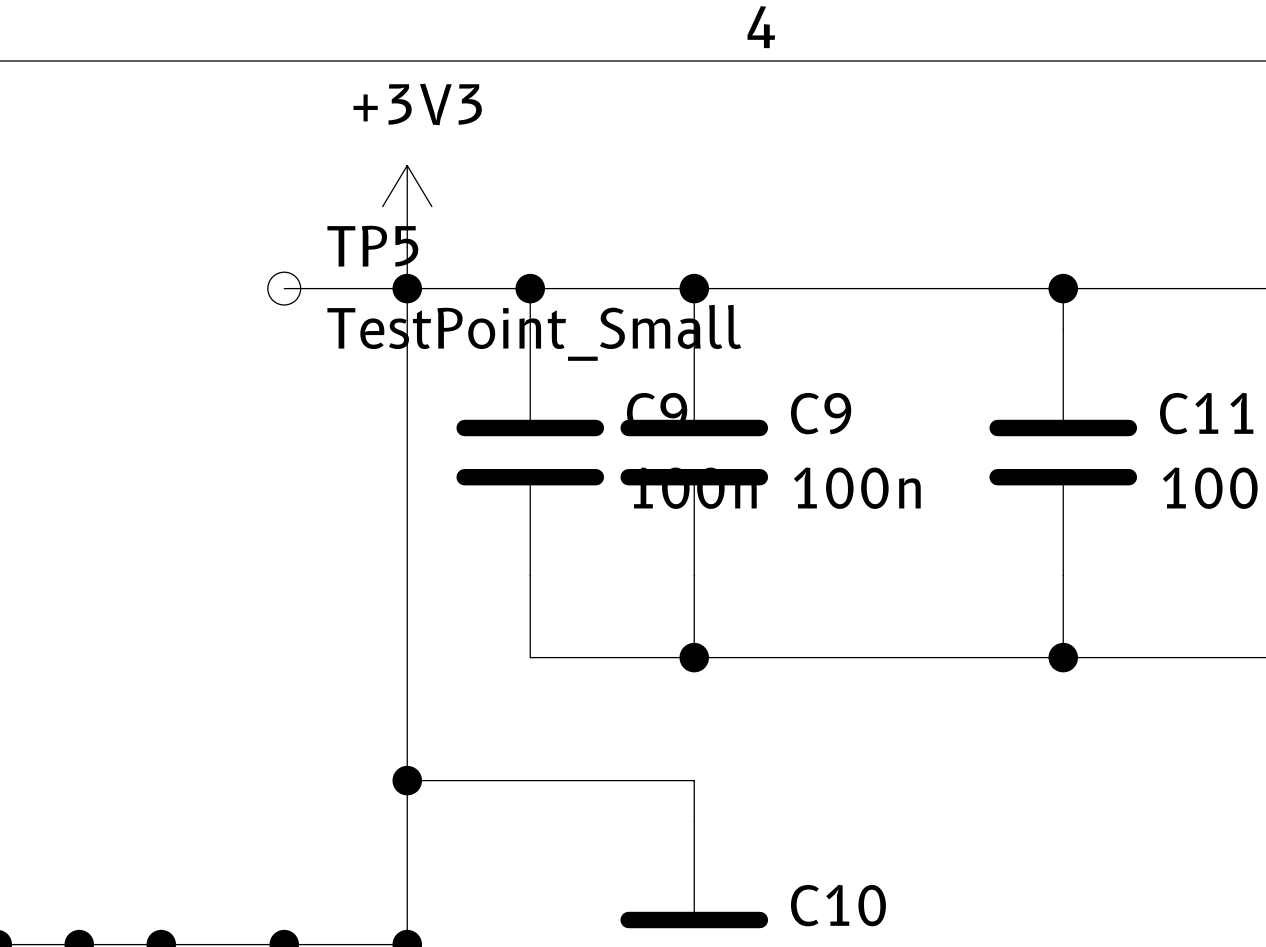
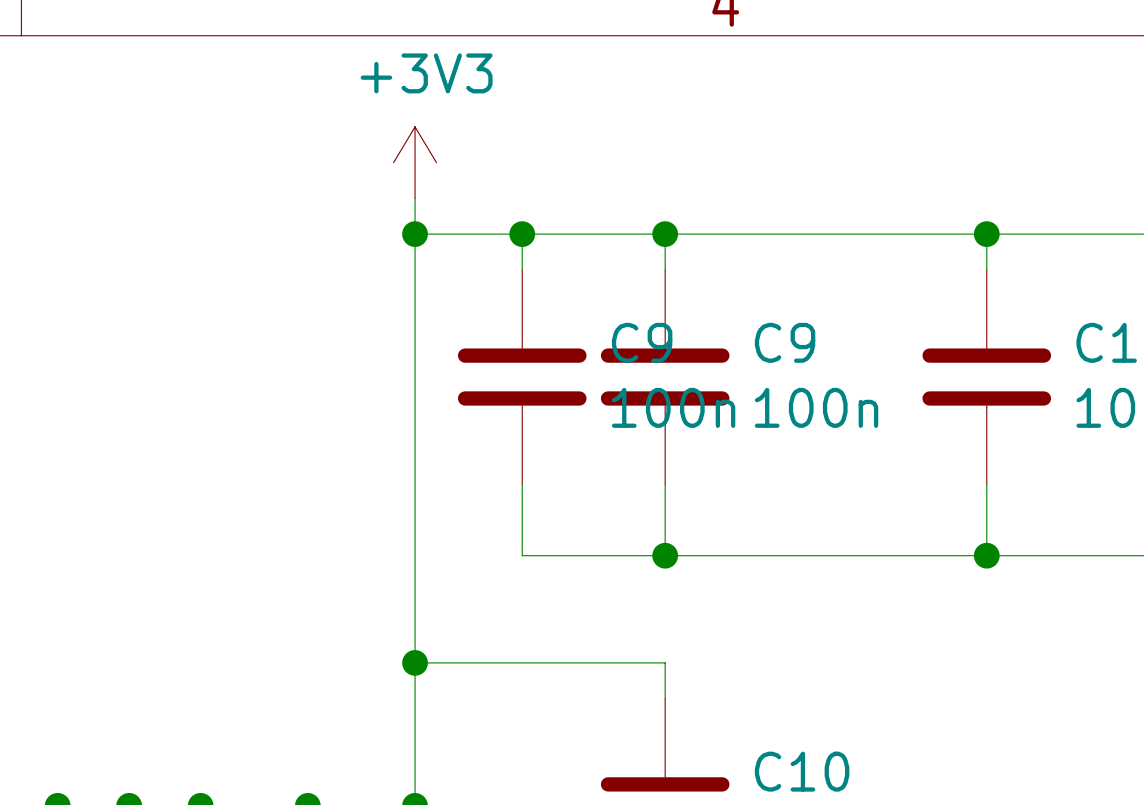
wire: (284, 288) (407, 288) -> none
TP5: TestPoint_Small (284, 288) -> none

